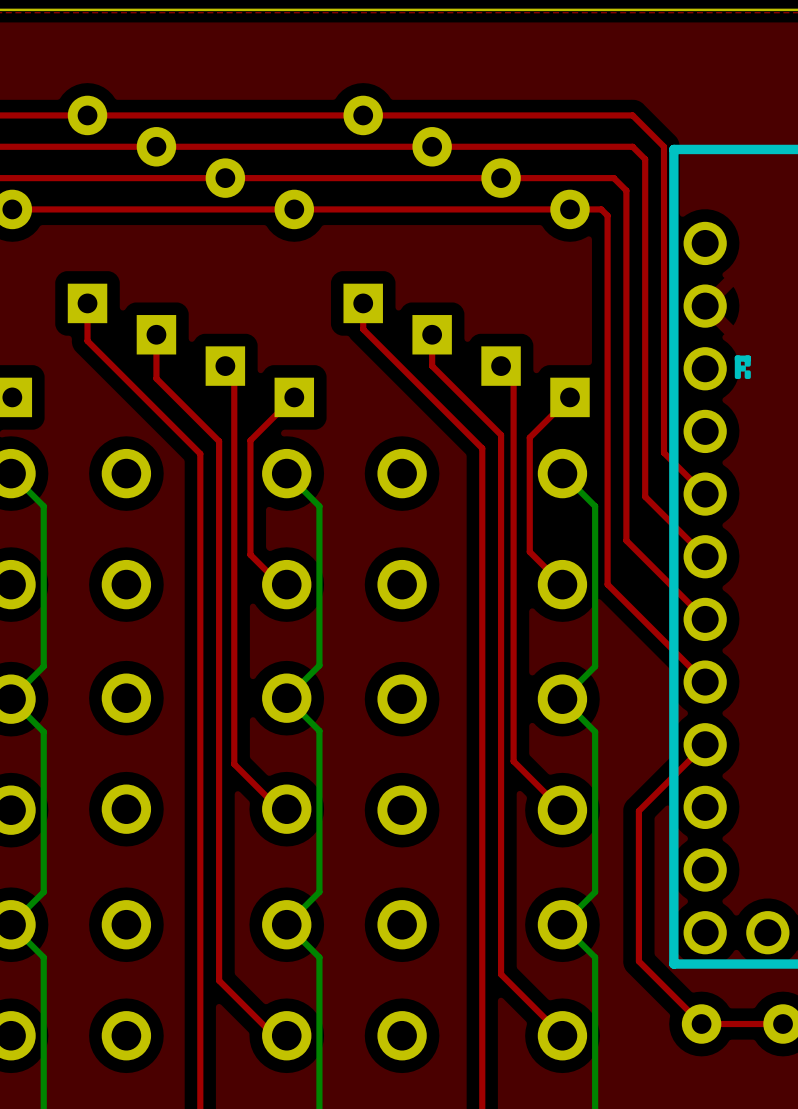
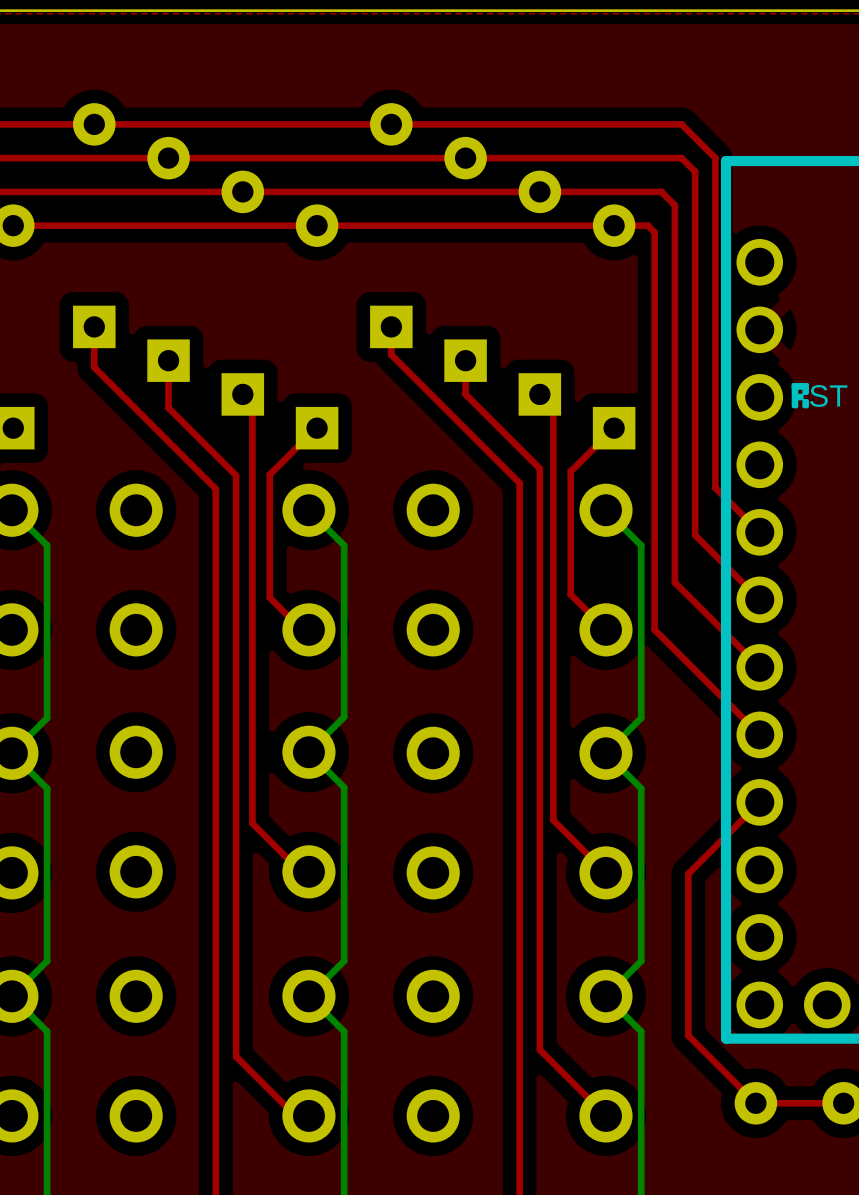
part text: none -> ST (828, 395)

